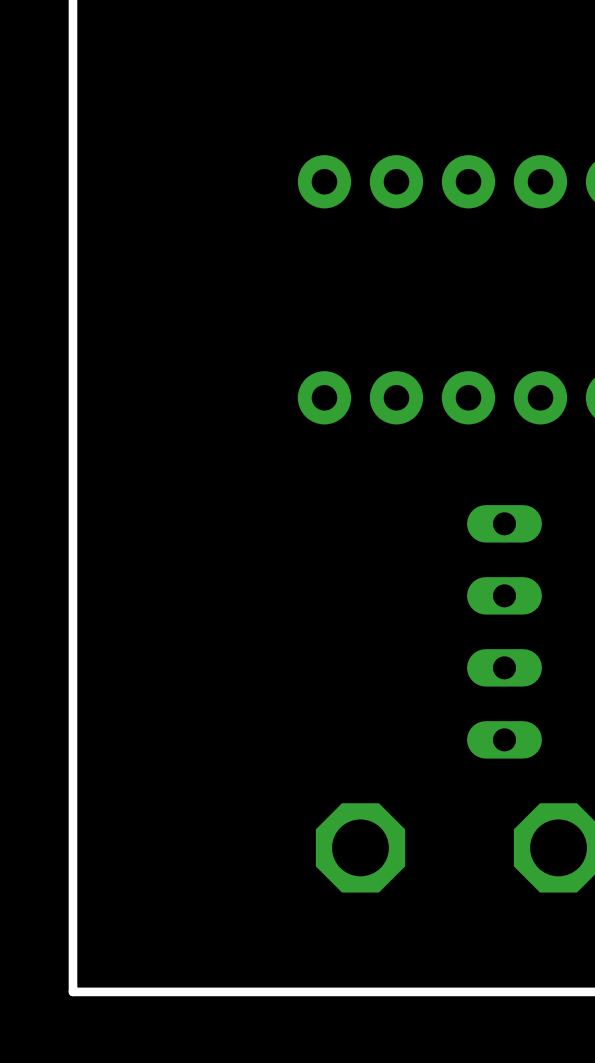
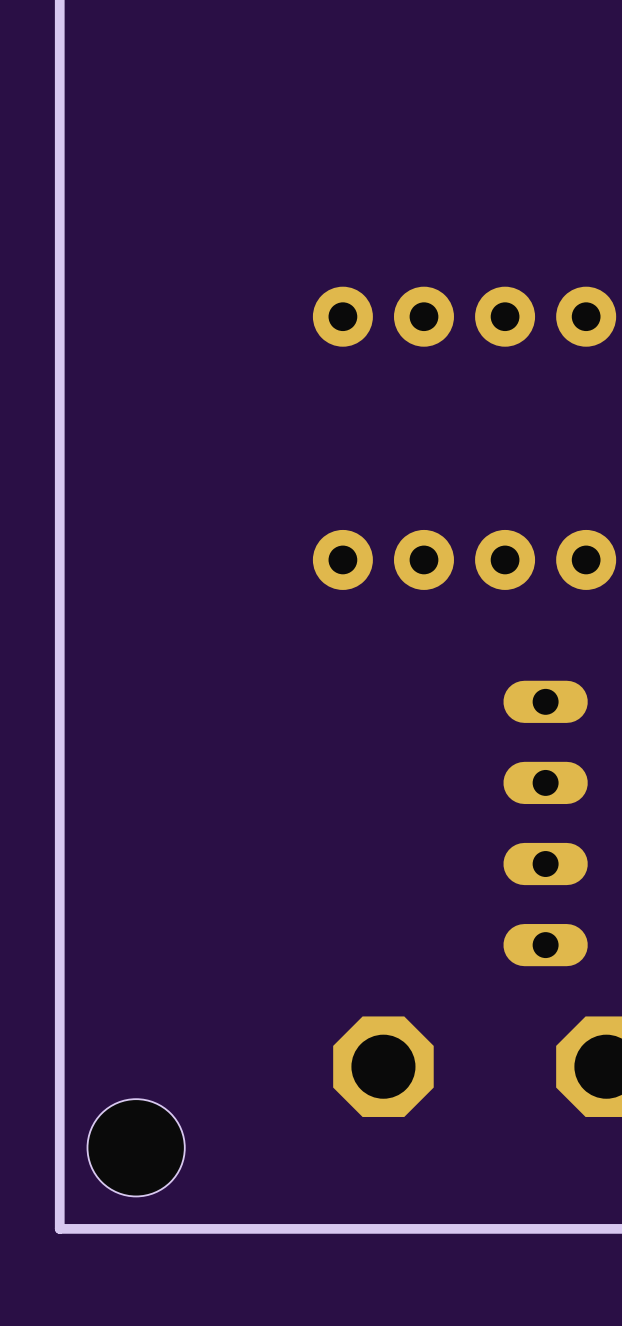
hole: none -> (136, 1147)

